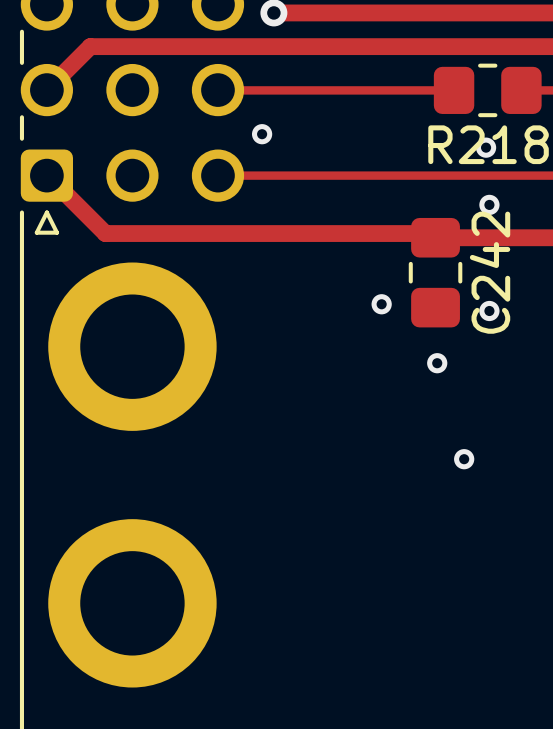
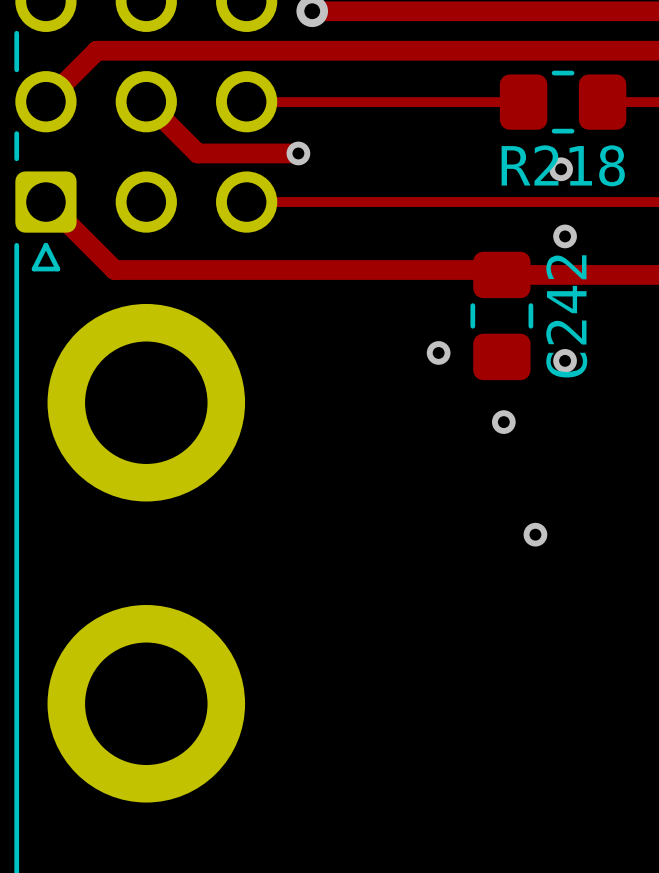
track: none -> (146, 102) (197, 153) (298, 153)

